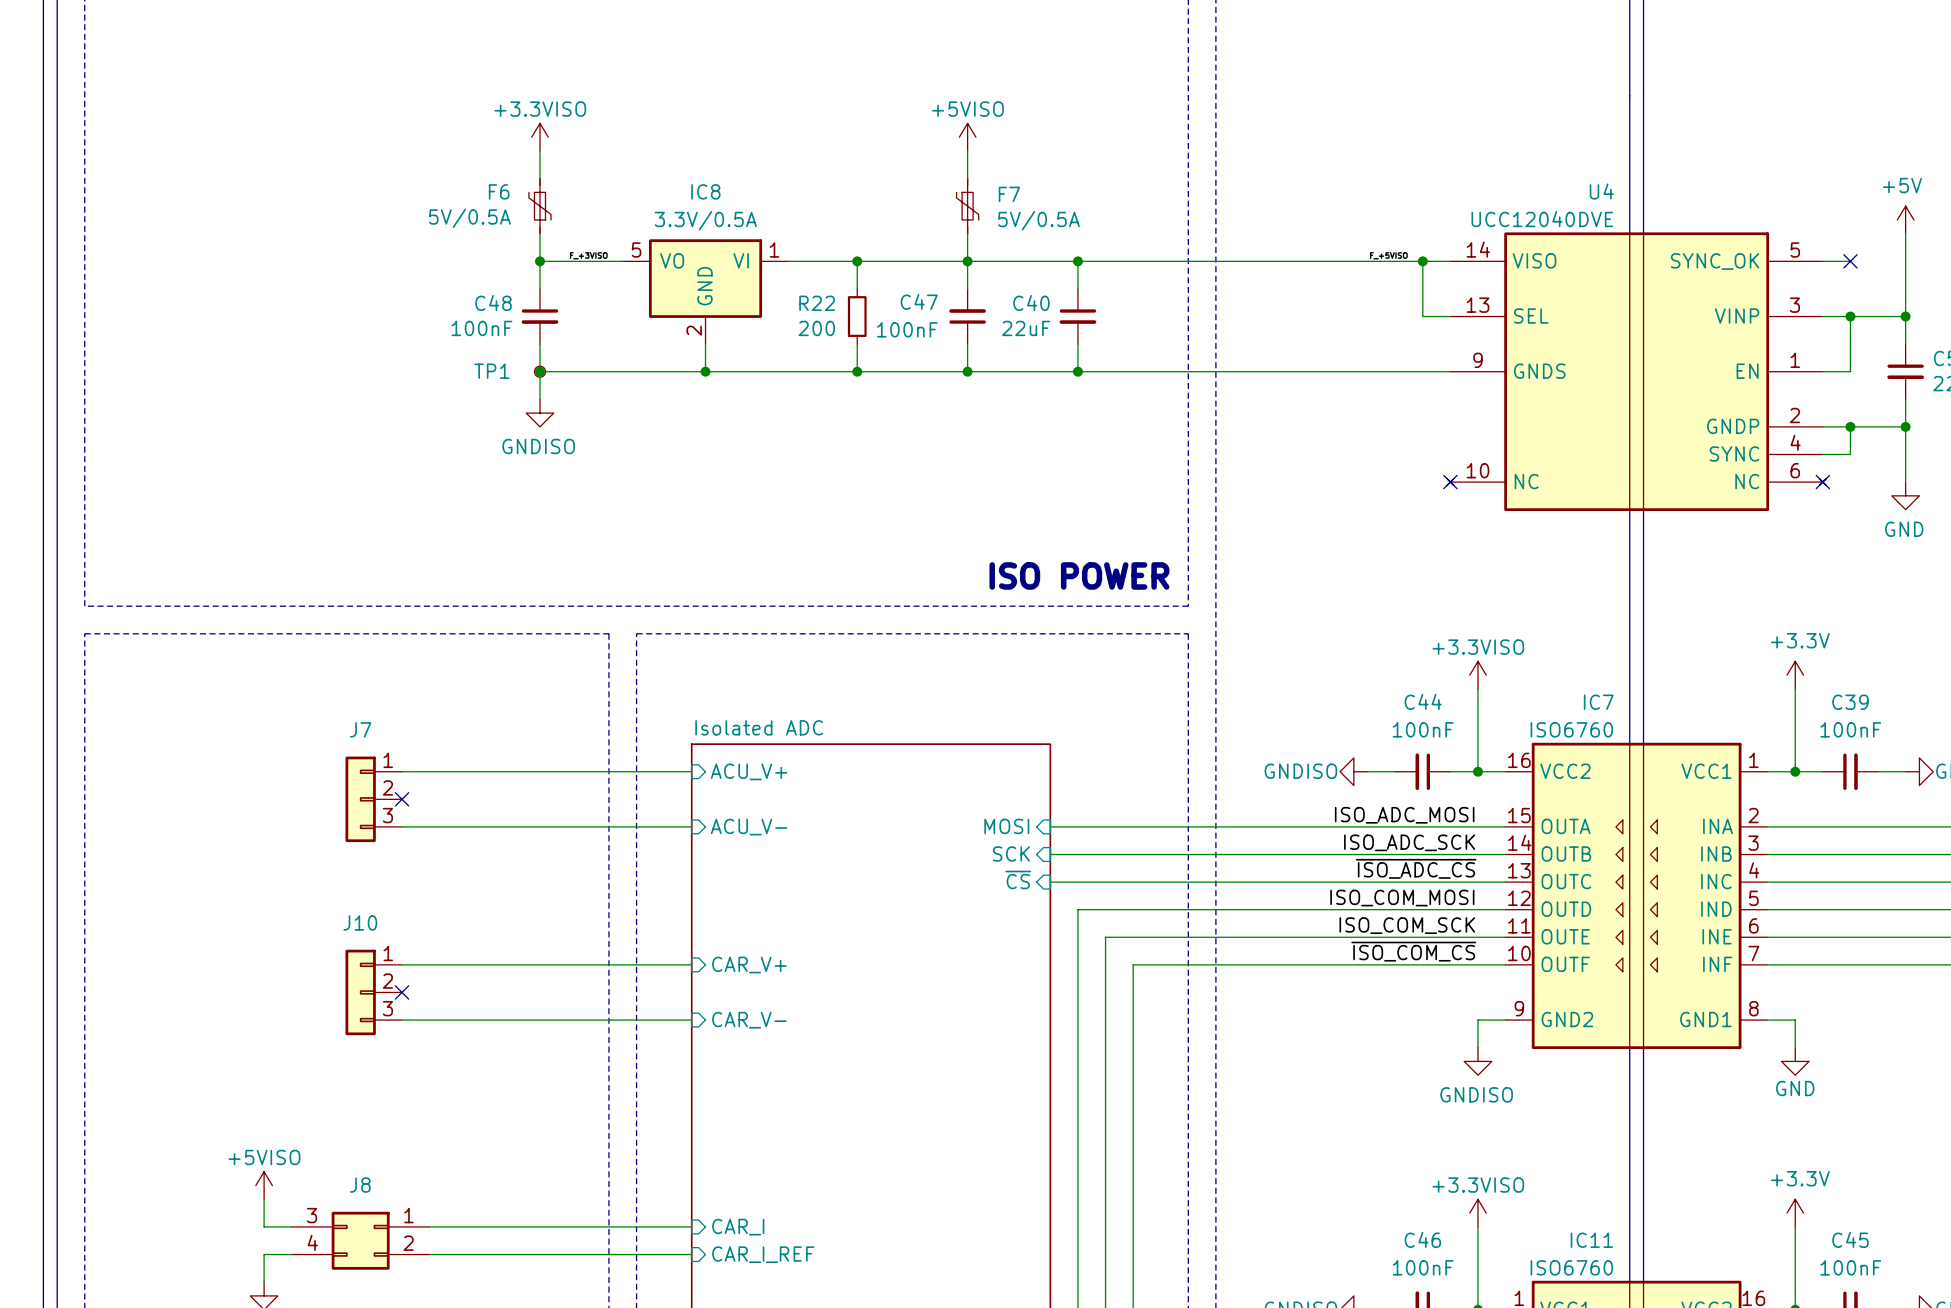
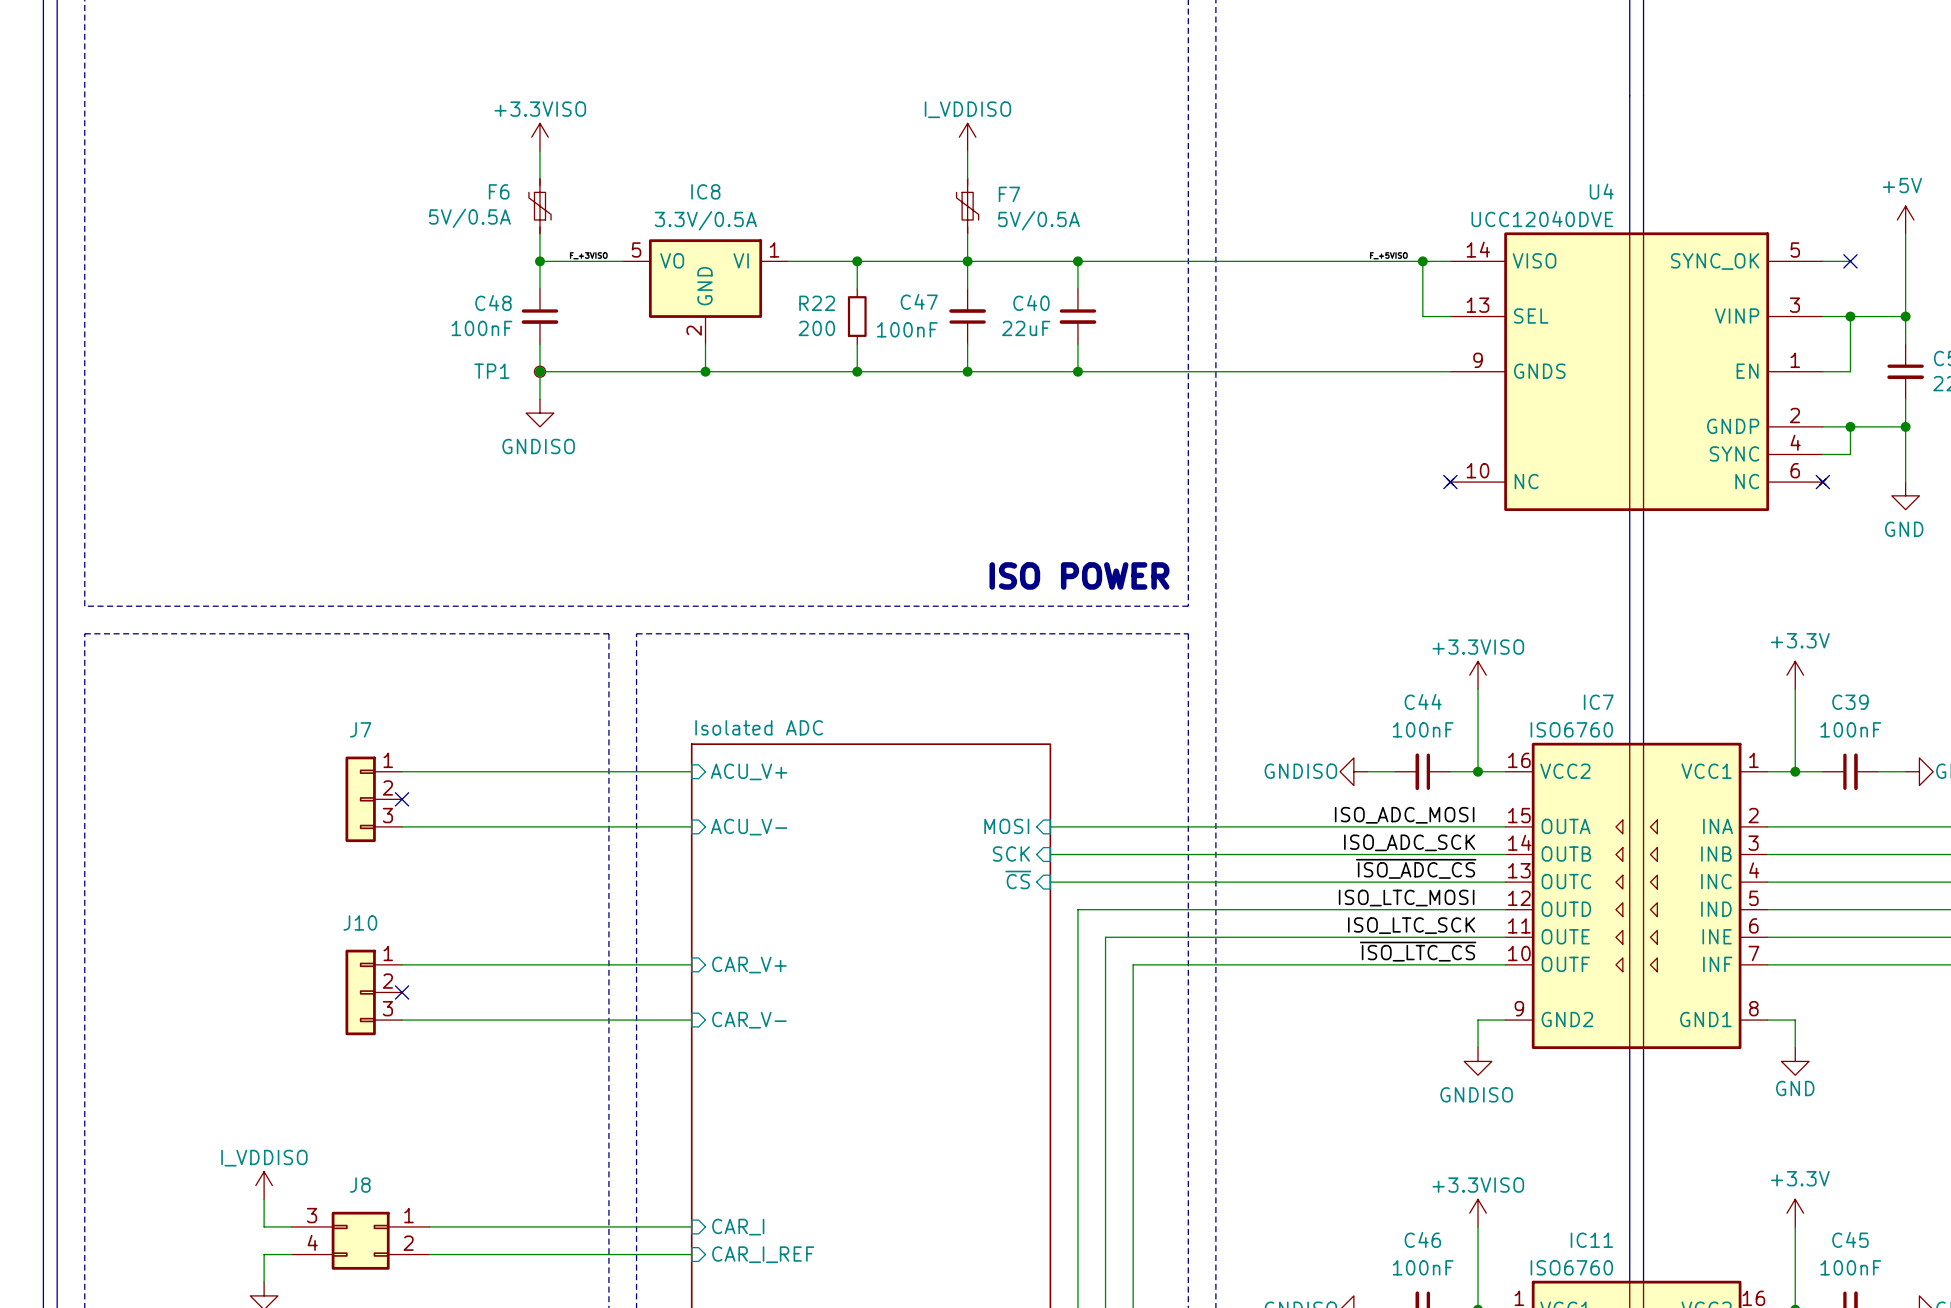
power symbol: +5VISO (967, 137) -> I_VDDISO (967, 137)
label: ISO_COM_MOSI (1402, 898) -> ISO_LTC_MOSI (1406, 898)
label: ISO_COM_SCK (1407, 925) -> ISO_LTC_SCK (1411, 925)
label: ~{ISO_COM_CS} (1413, 951) -> ~{ISO_LTC_CS} (1418, 951)
power symbol: +5VISO (264, 1185) -> I_VDDISO (264, 1185)

